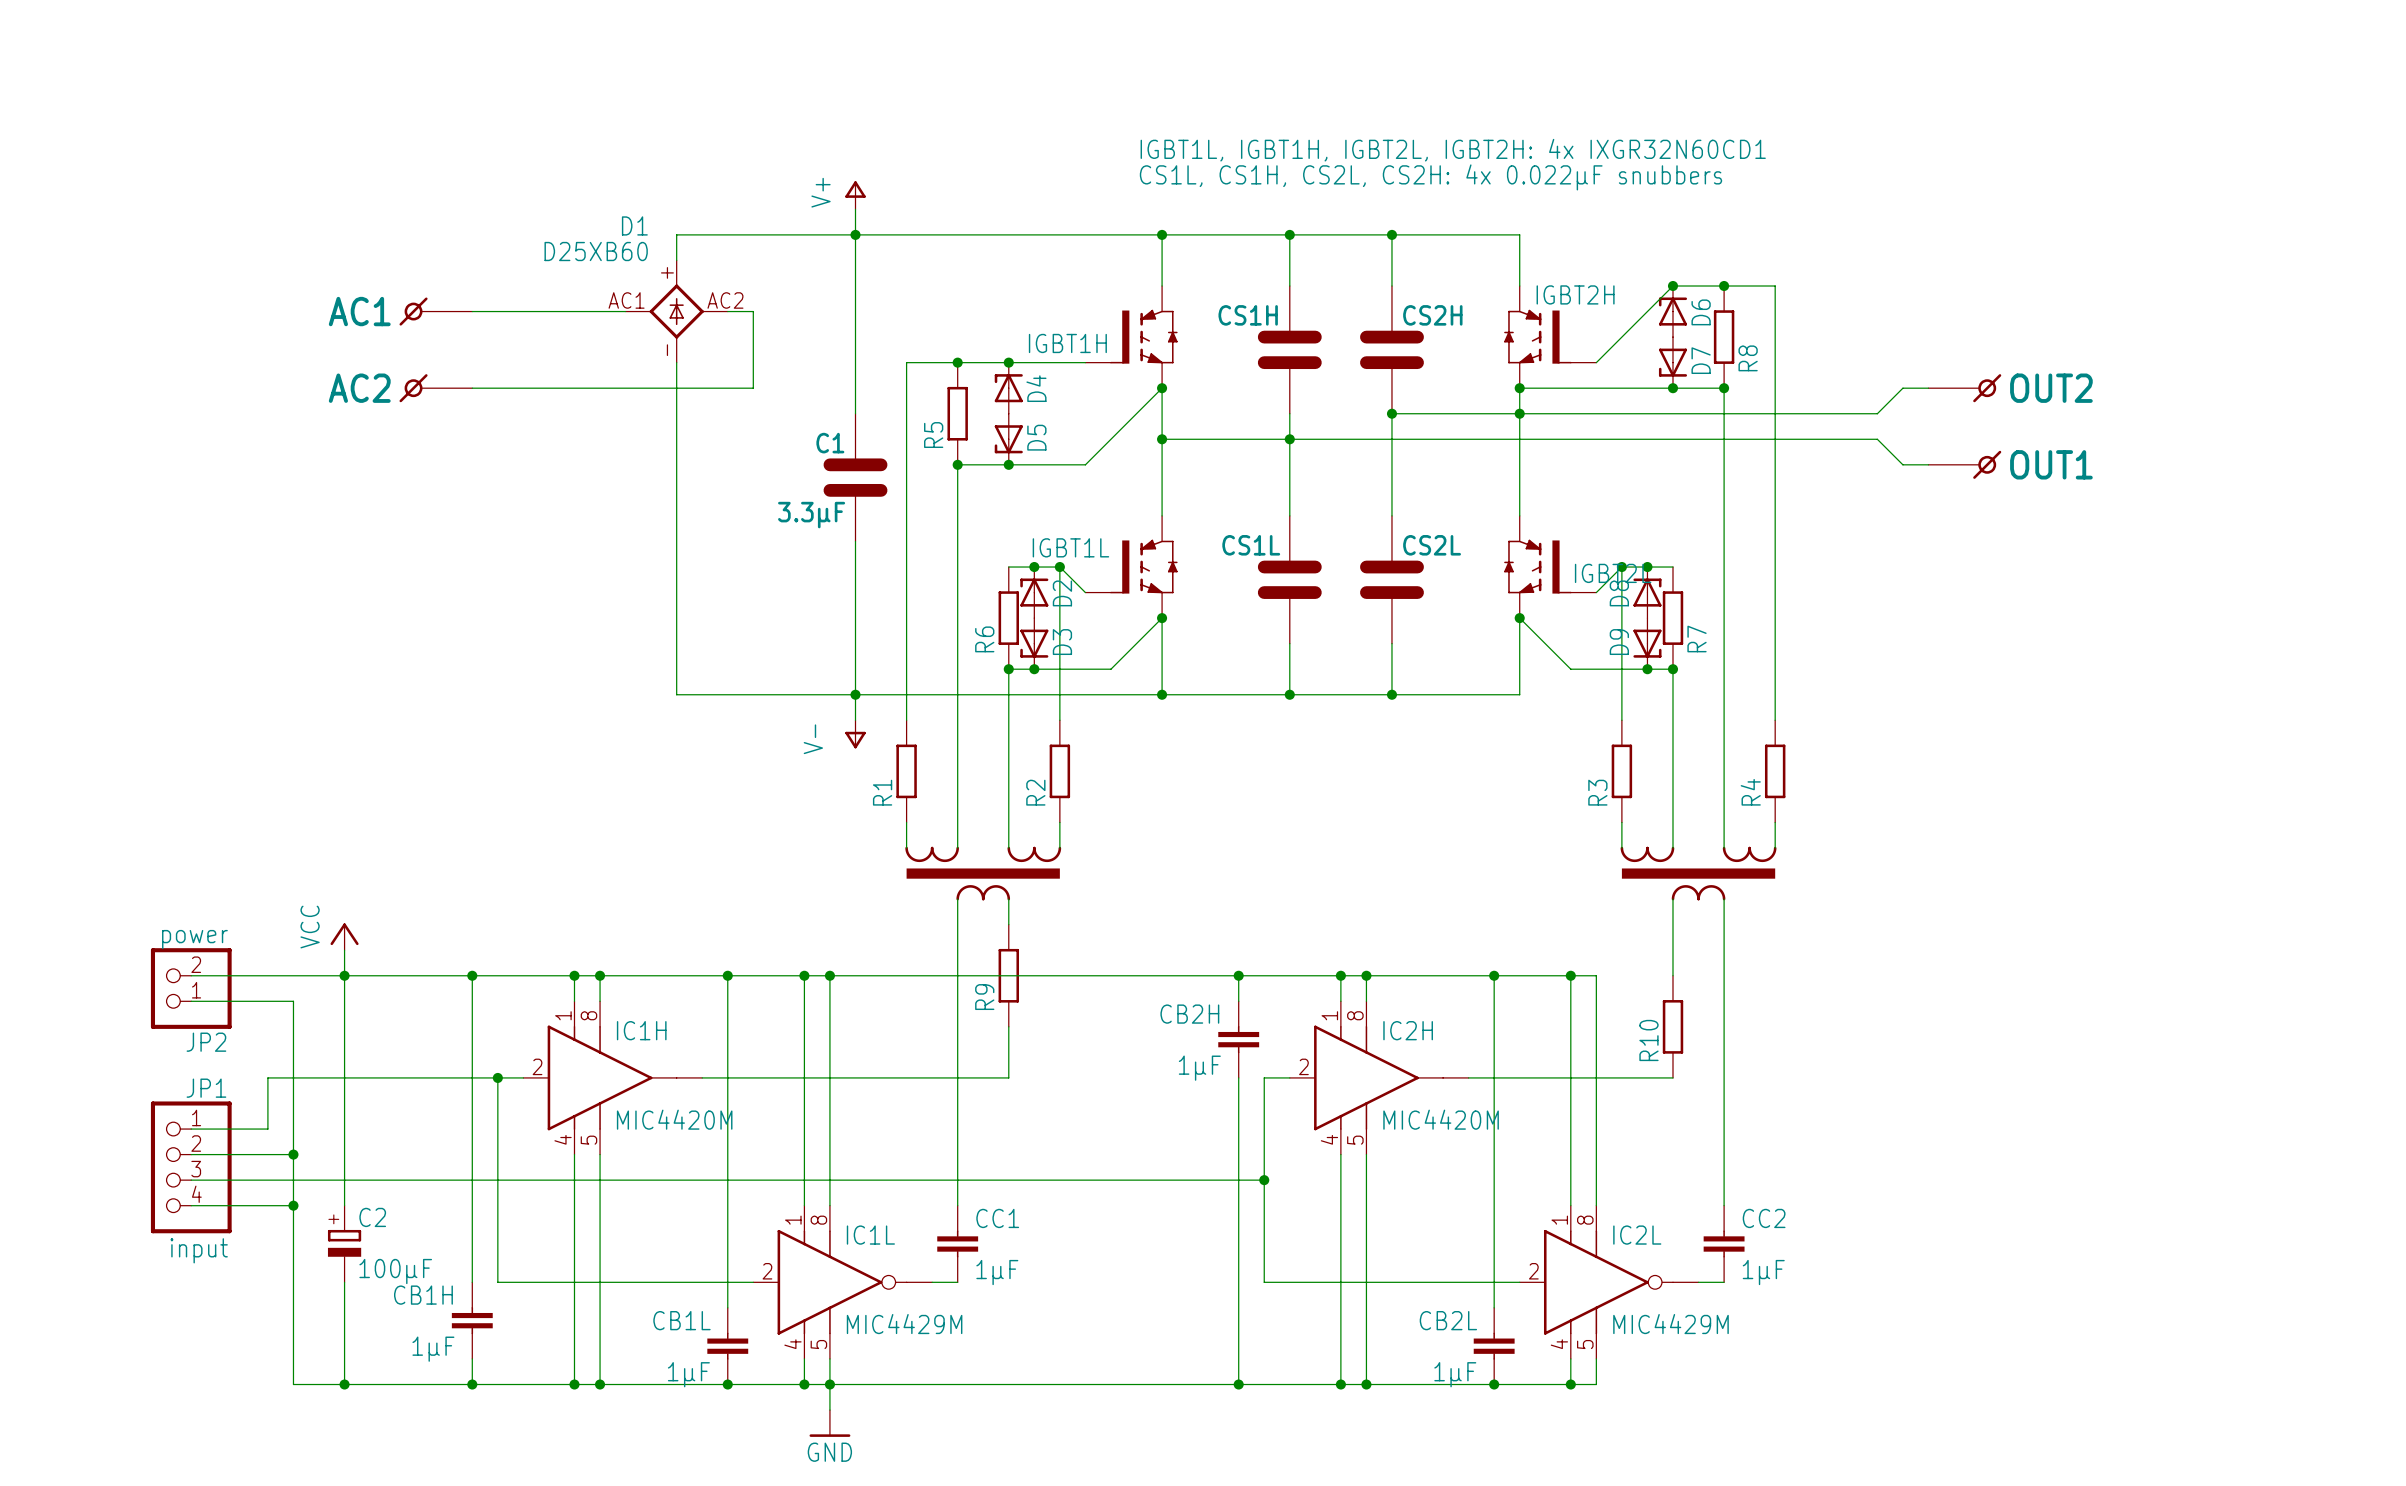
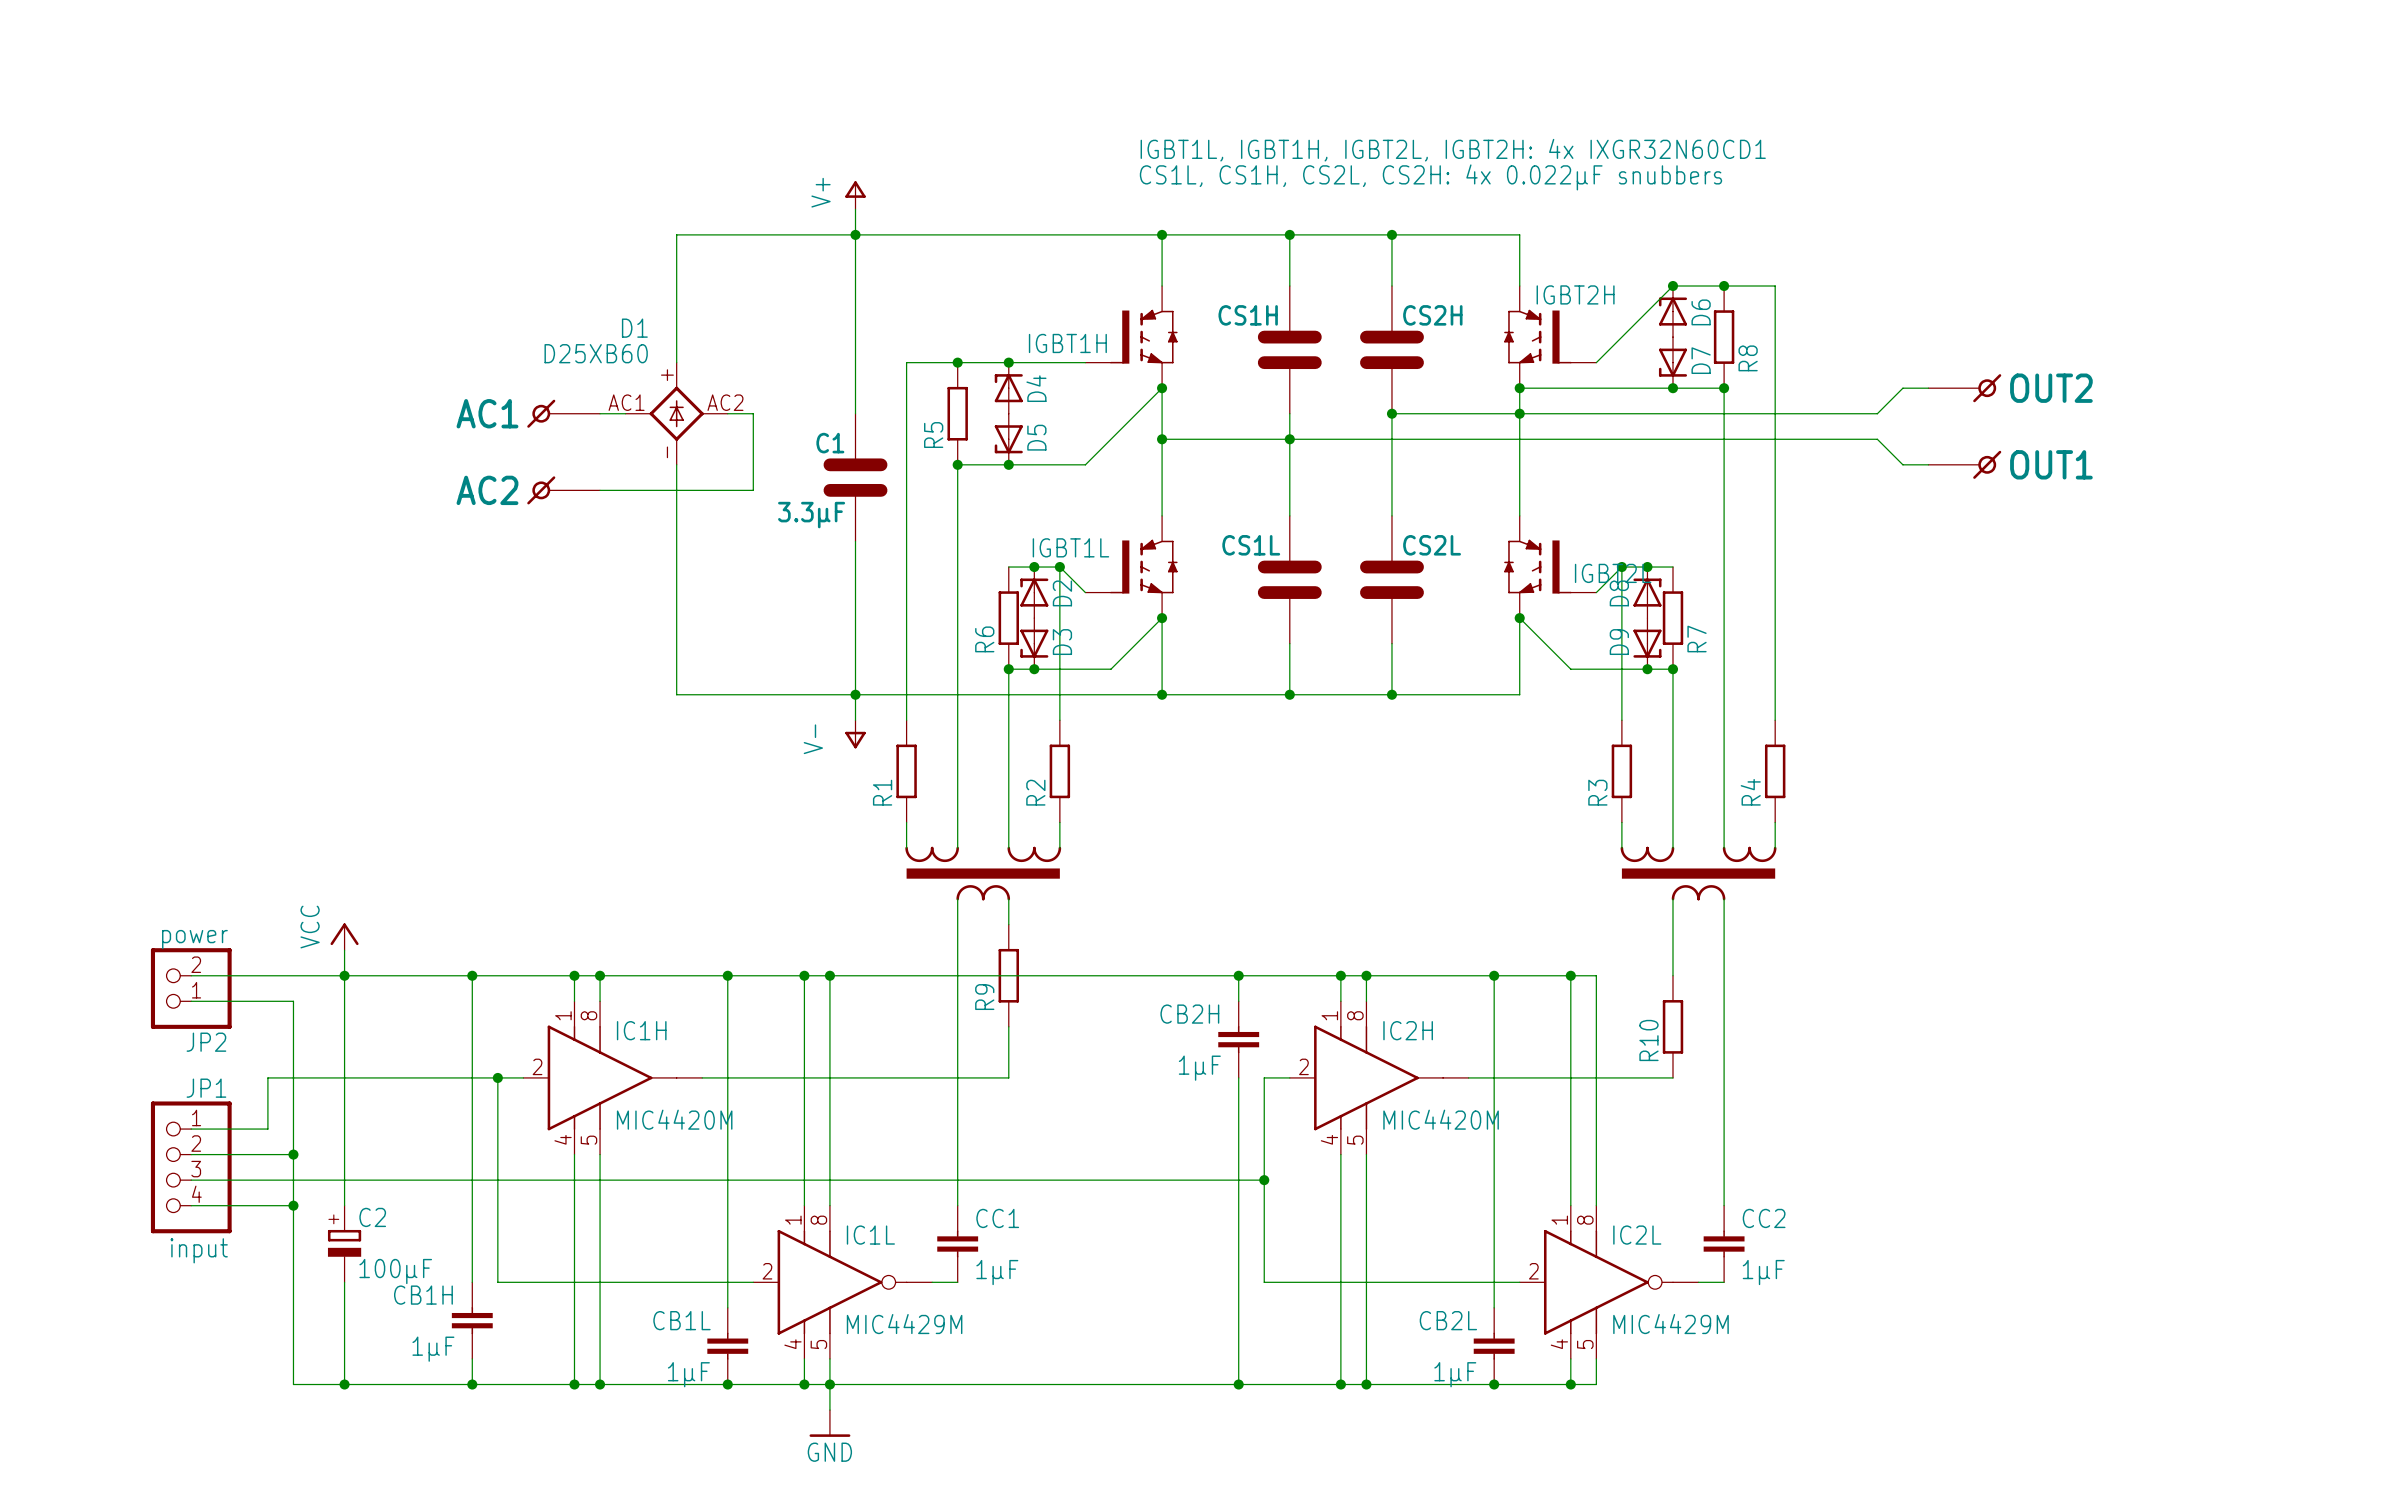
part position: (435, 311) -> (563, 413)
wire: (472, 311) (625, 311) -> none
D1 position: (676, 311) -> (676, 413)
wire: (727, 311) (753, 311) (753, 388) (472, 388) -> none
part position: (435, 388) -> (563, 490)
wire: none -> (600, 413) (625, 413)
wire: none -> (727, 413) (753, 413) (753, 490) (600, 490)

